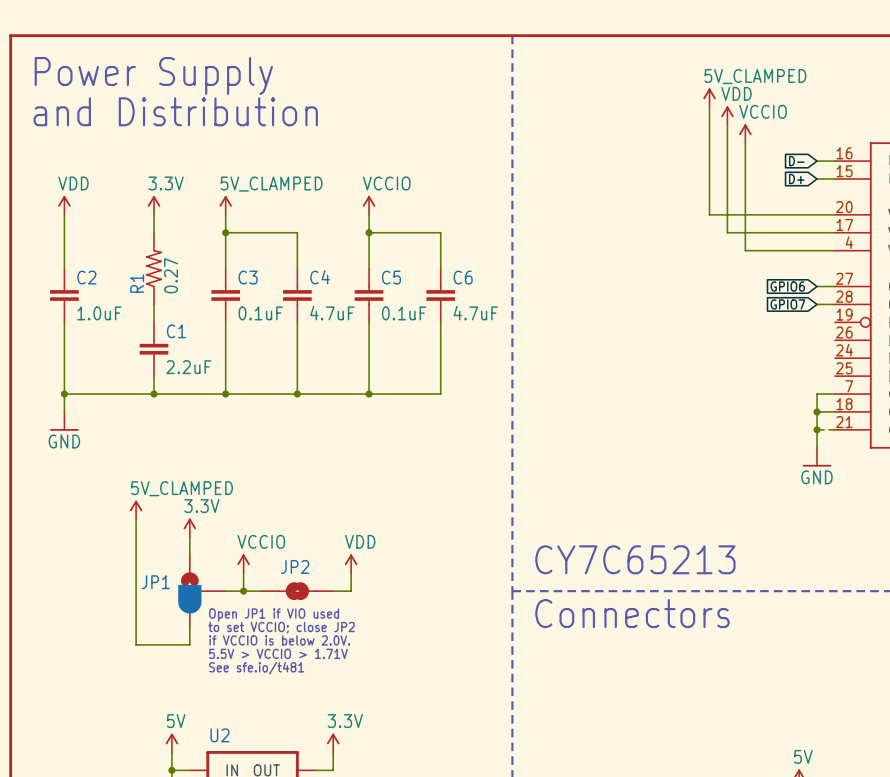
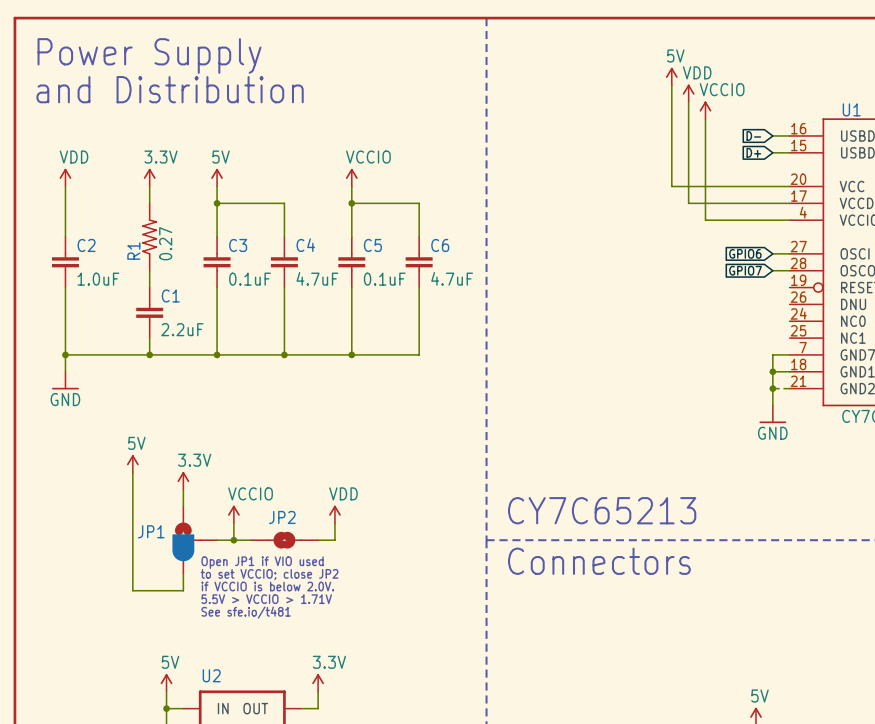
power symbol: 5V_CLAMPED (709, 97) -> 5V (671, 76)
power symbol: 5V_CLAMPED (225, 205) -> 5V (217, 177)
power symbol: 5V_CLAMPED (136, 510) -> 5V (132, 463)

